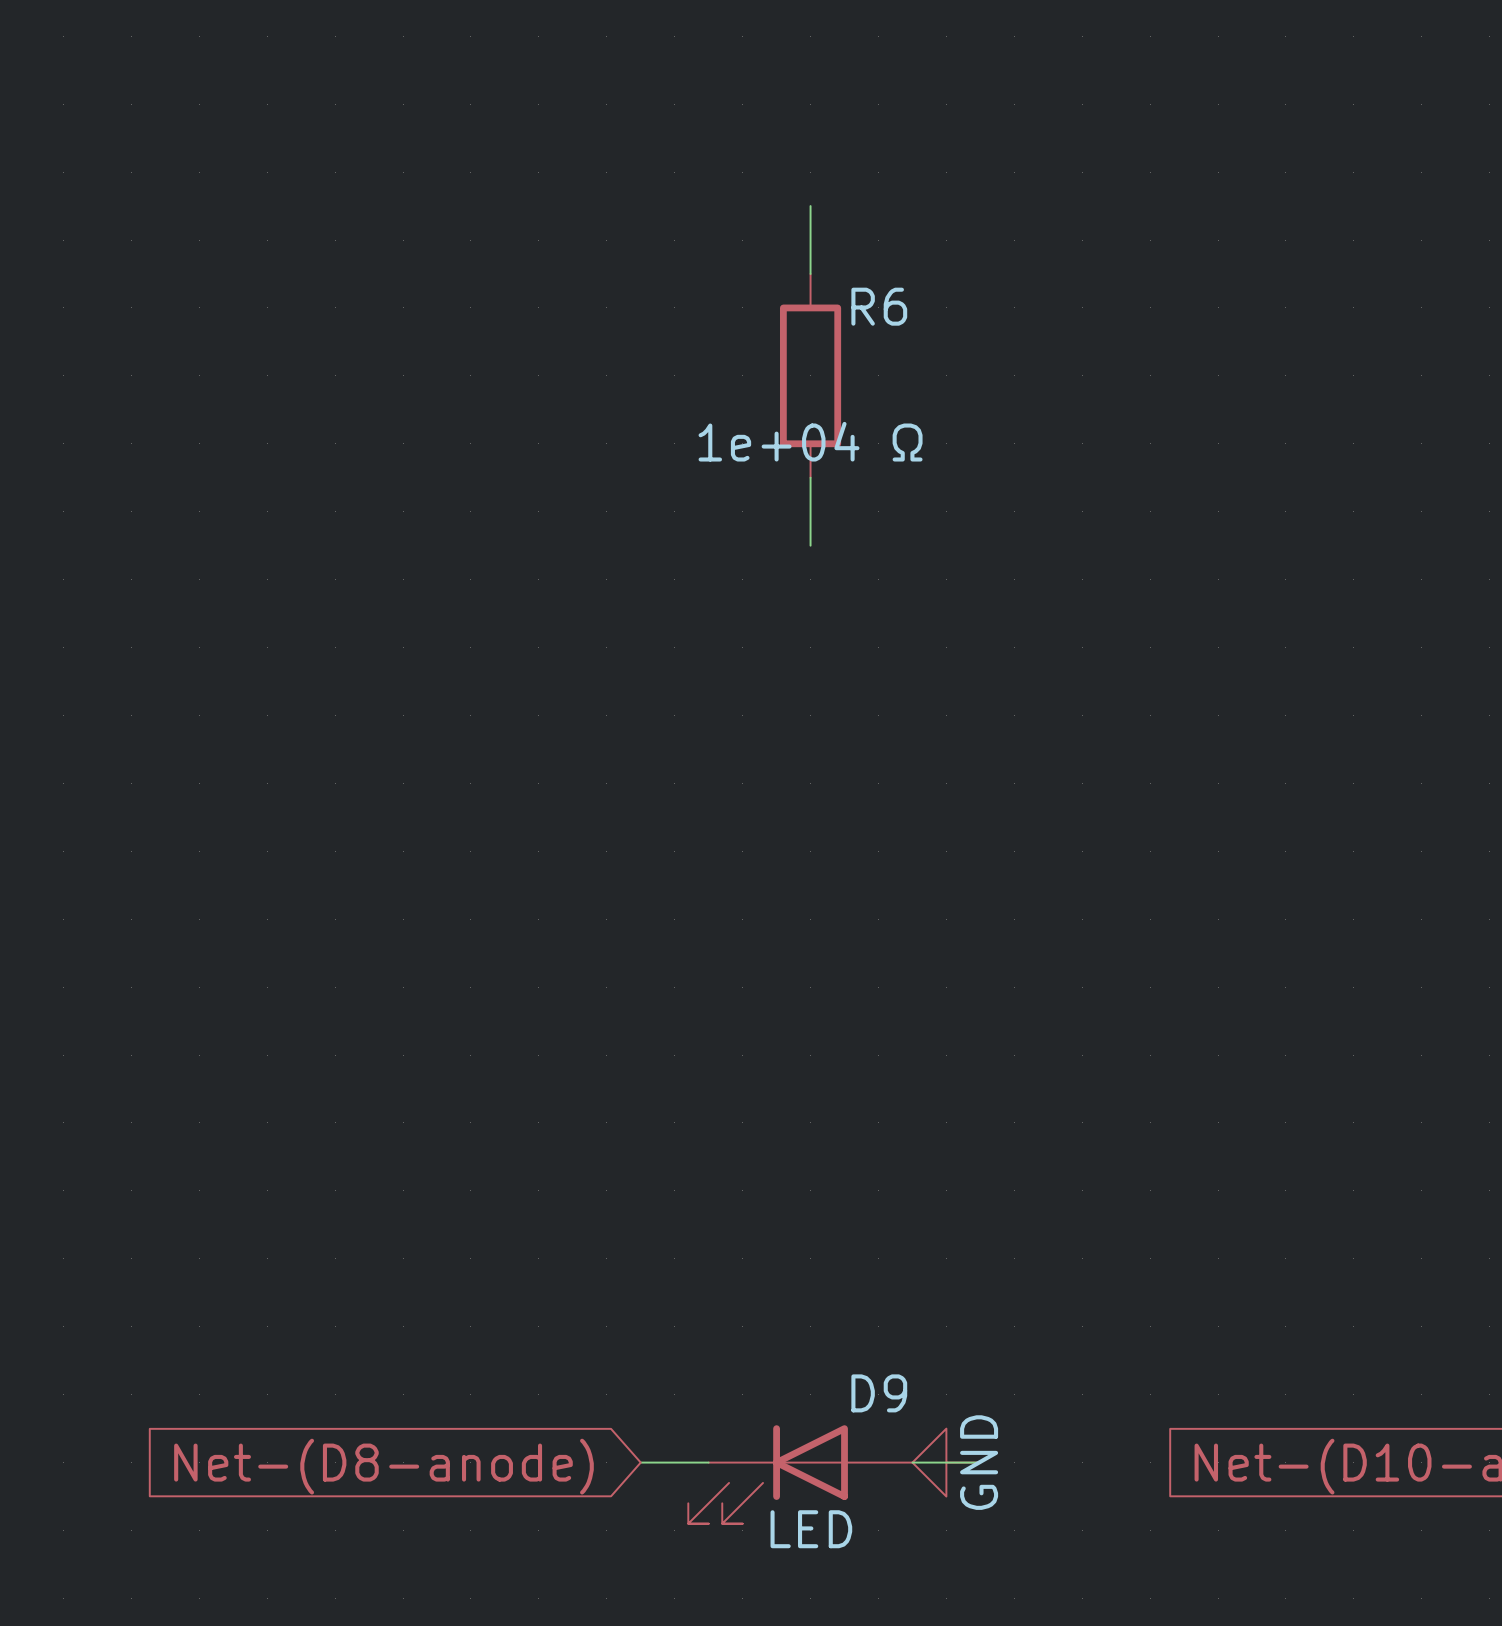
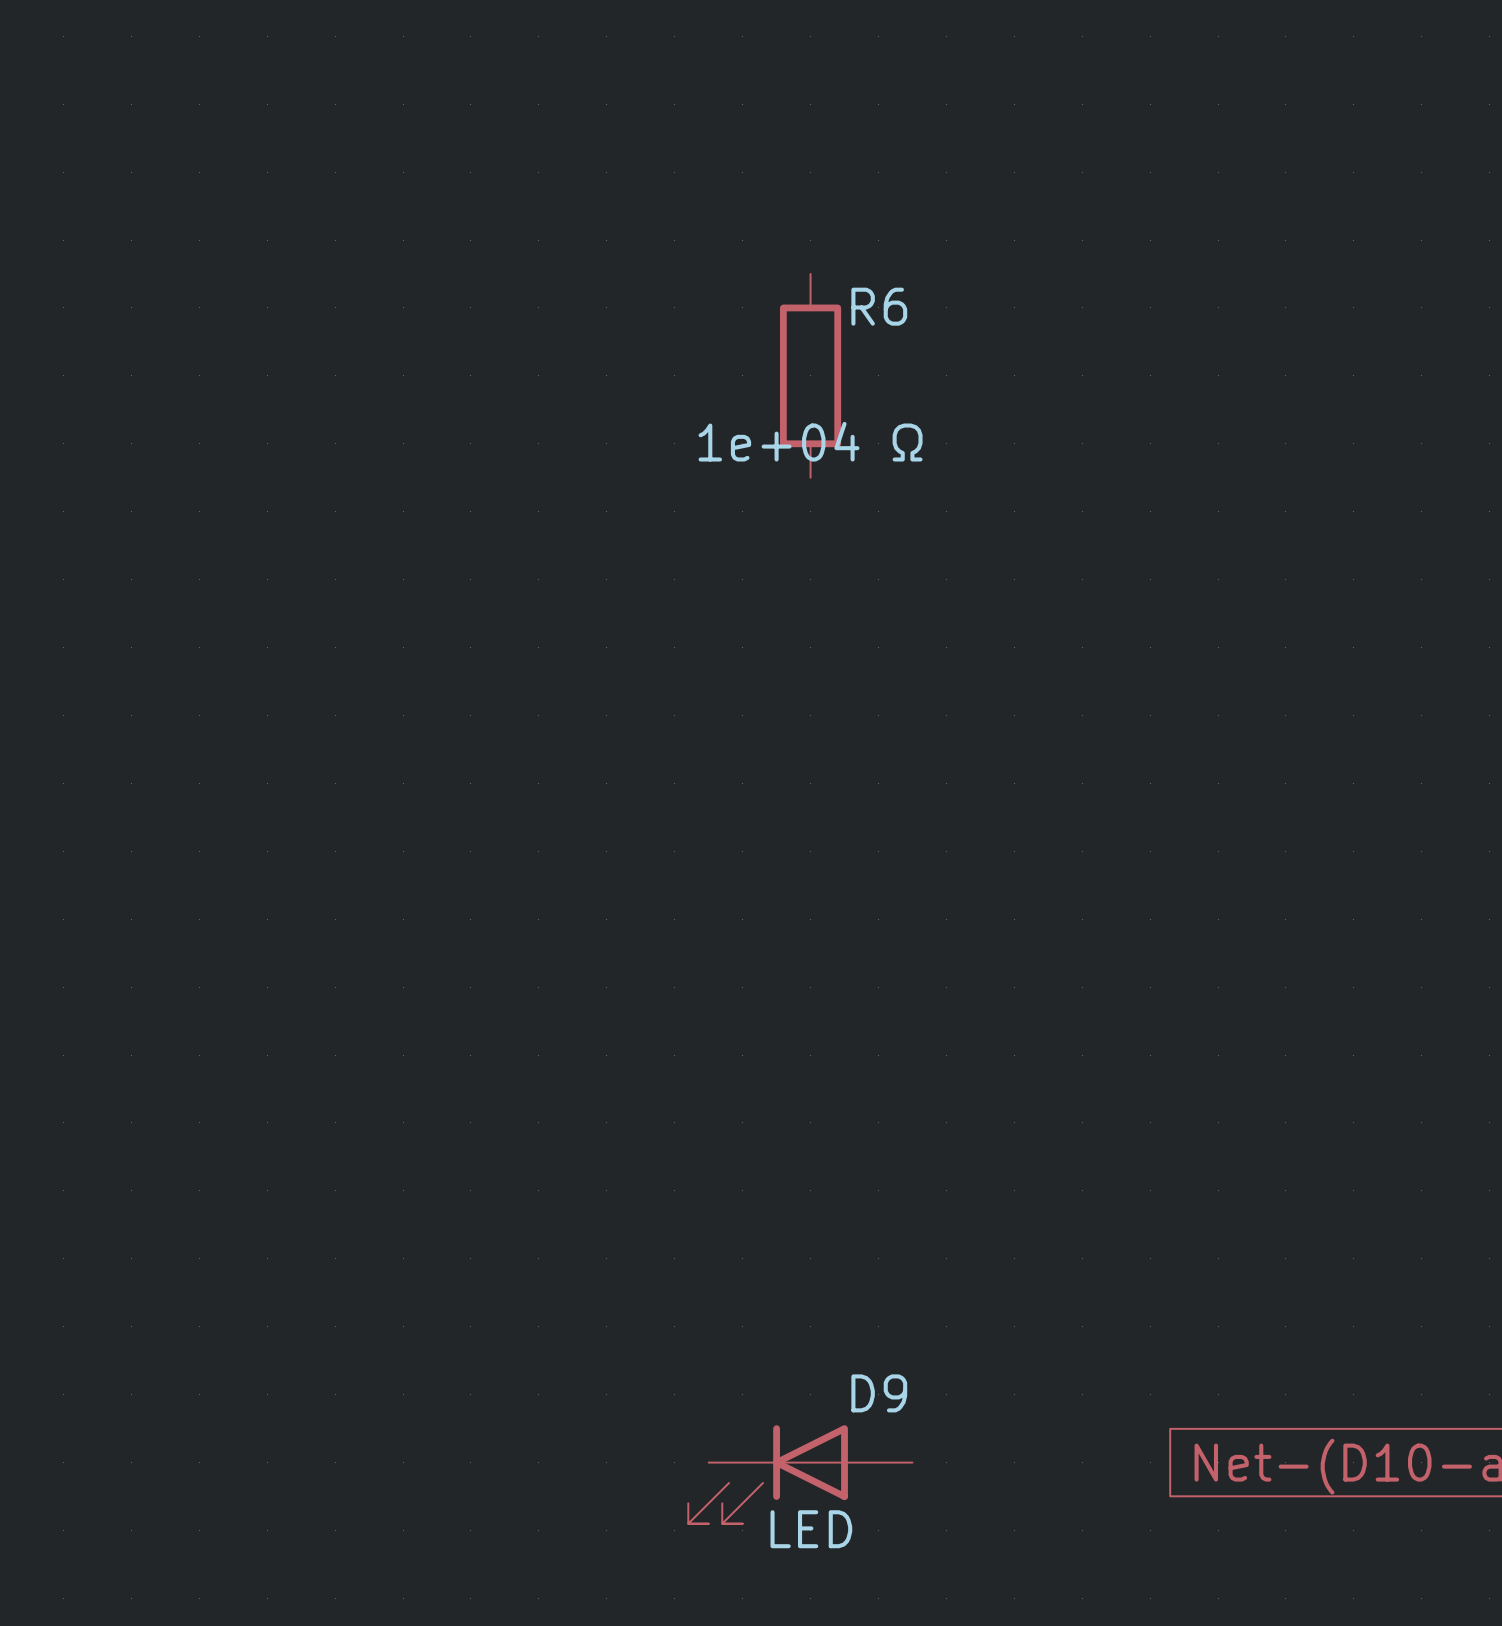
wire: (810, 206) (810, 273) -> none
wire: (810, 477) (810, 545) -> none
wire: (640, 1462) (708, 1462) -> none
wire: (912, 1462) (980, 1462) -> none
power symbol: GND (946, 1462) -> none
global label: Net-(D8-anode) (383, 1466) -> none

